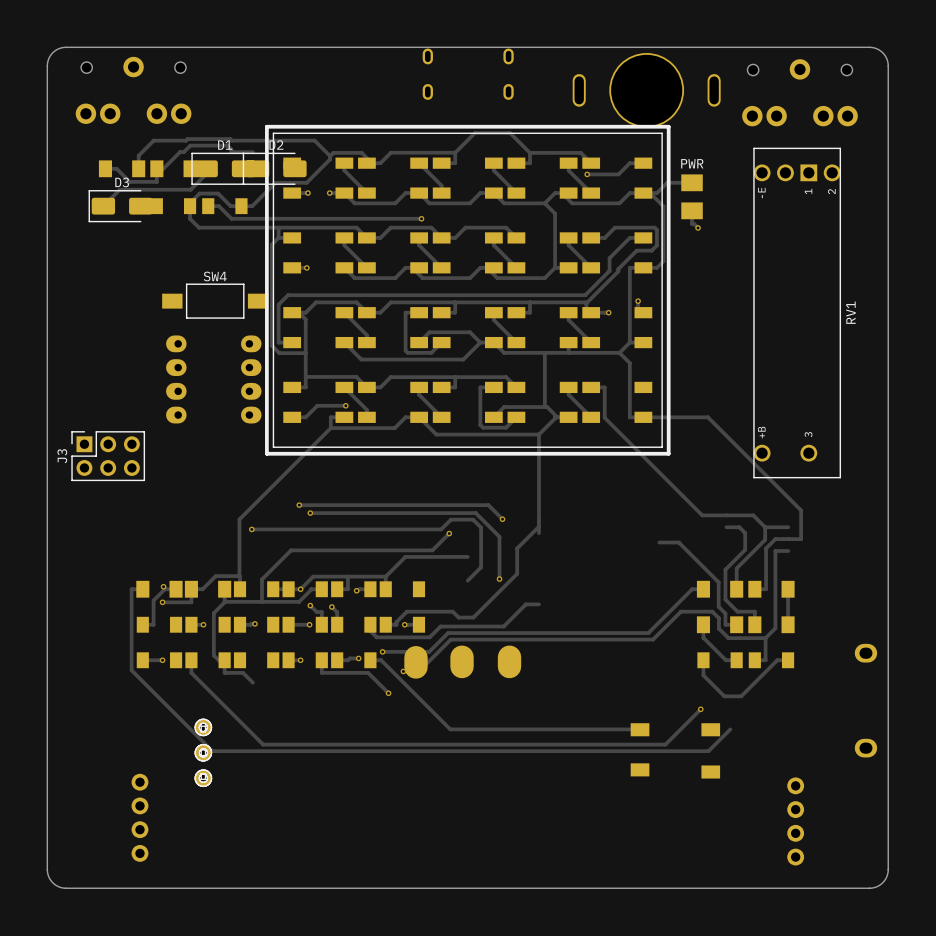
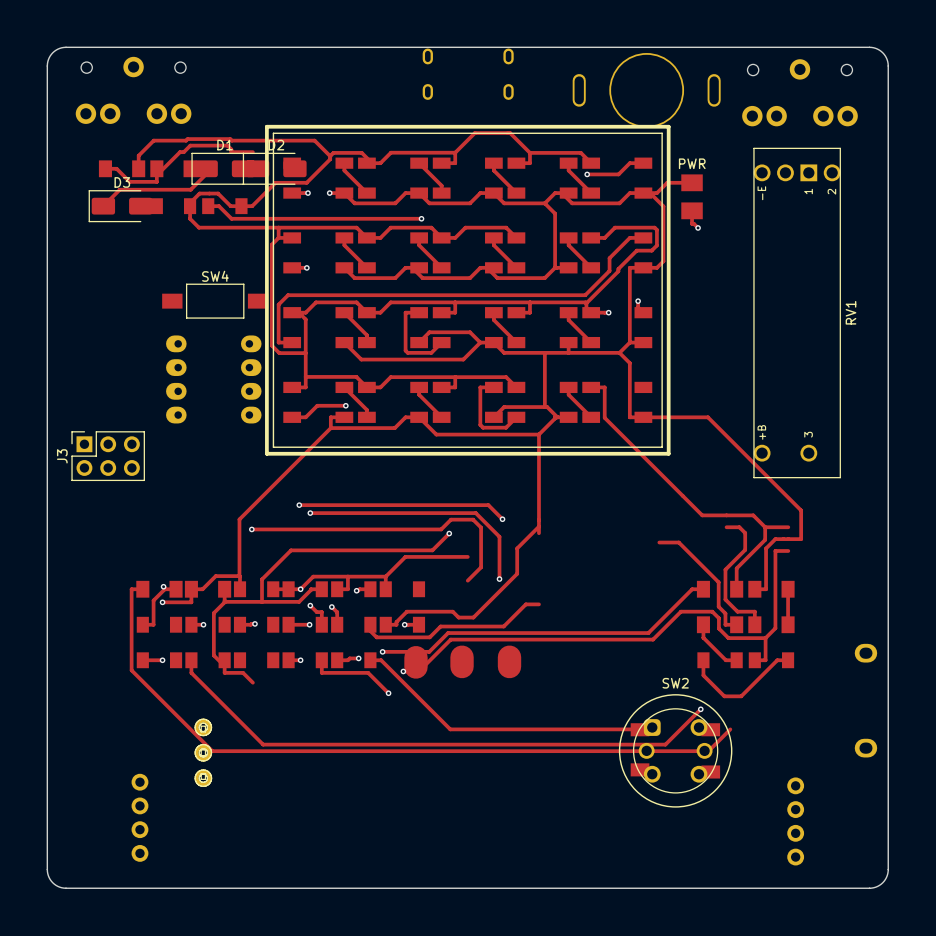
SW2: none -> (675, 750)

